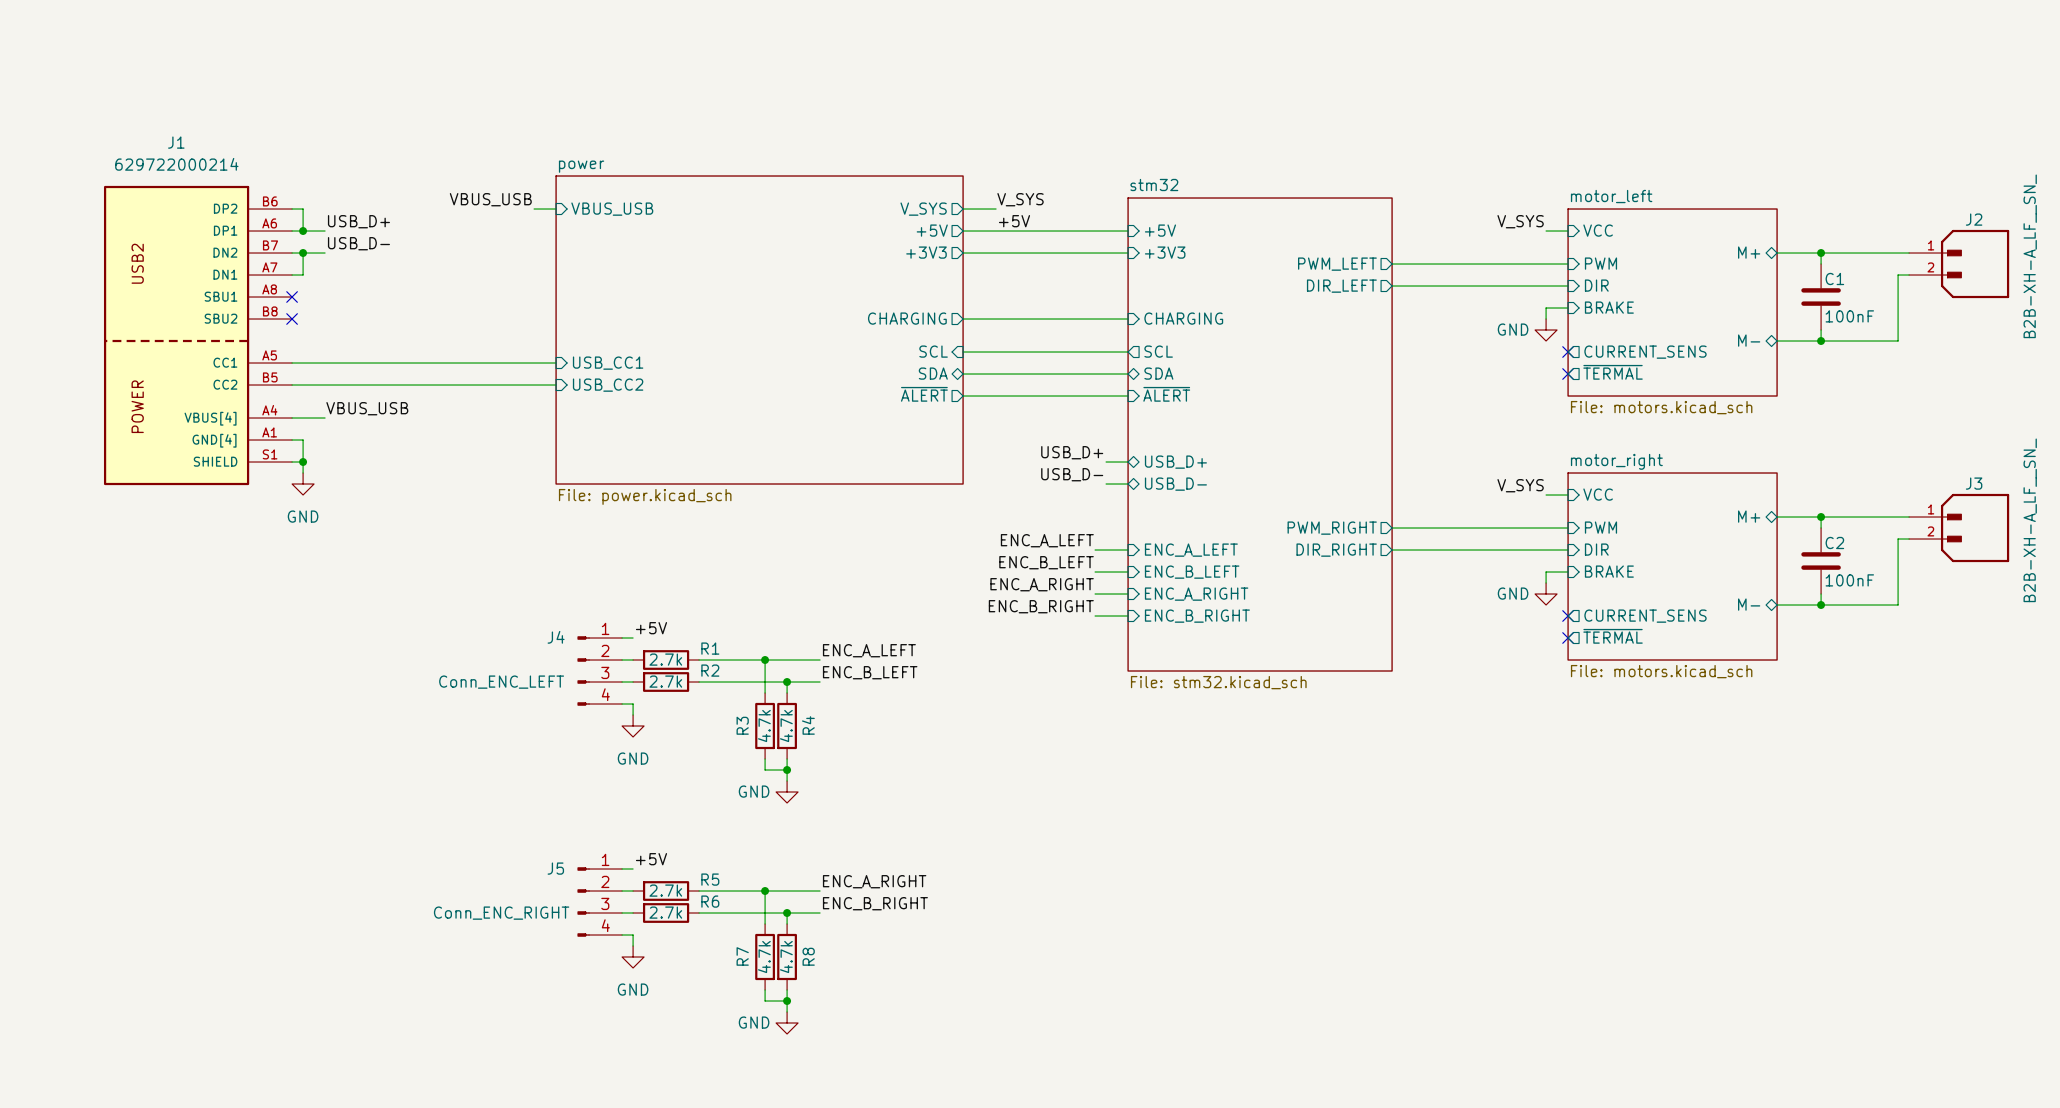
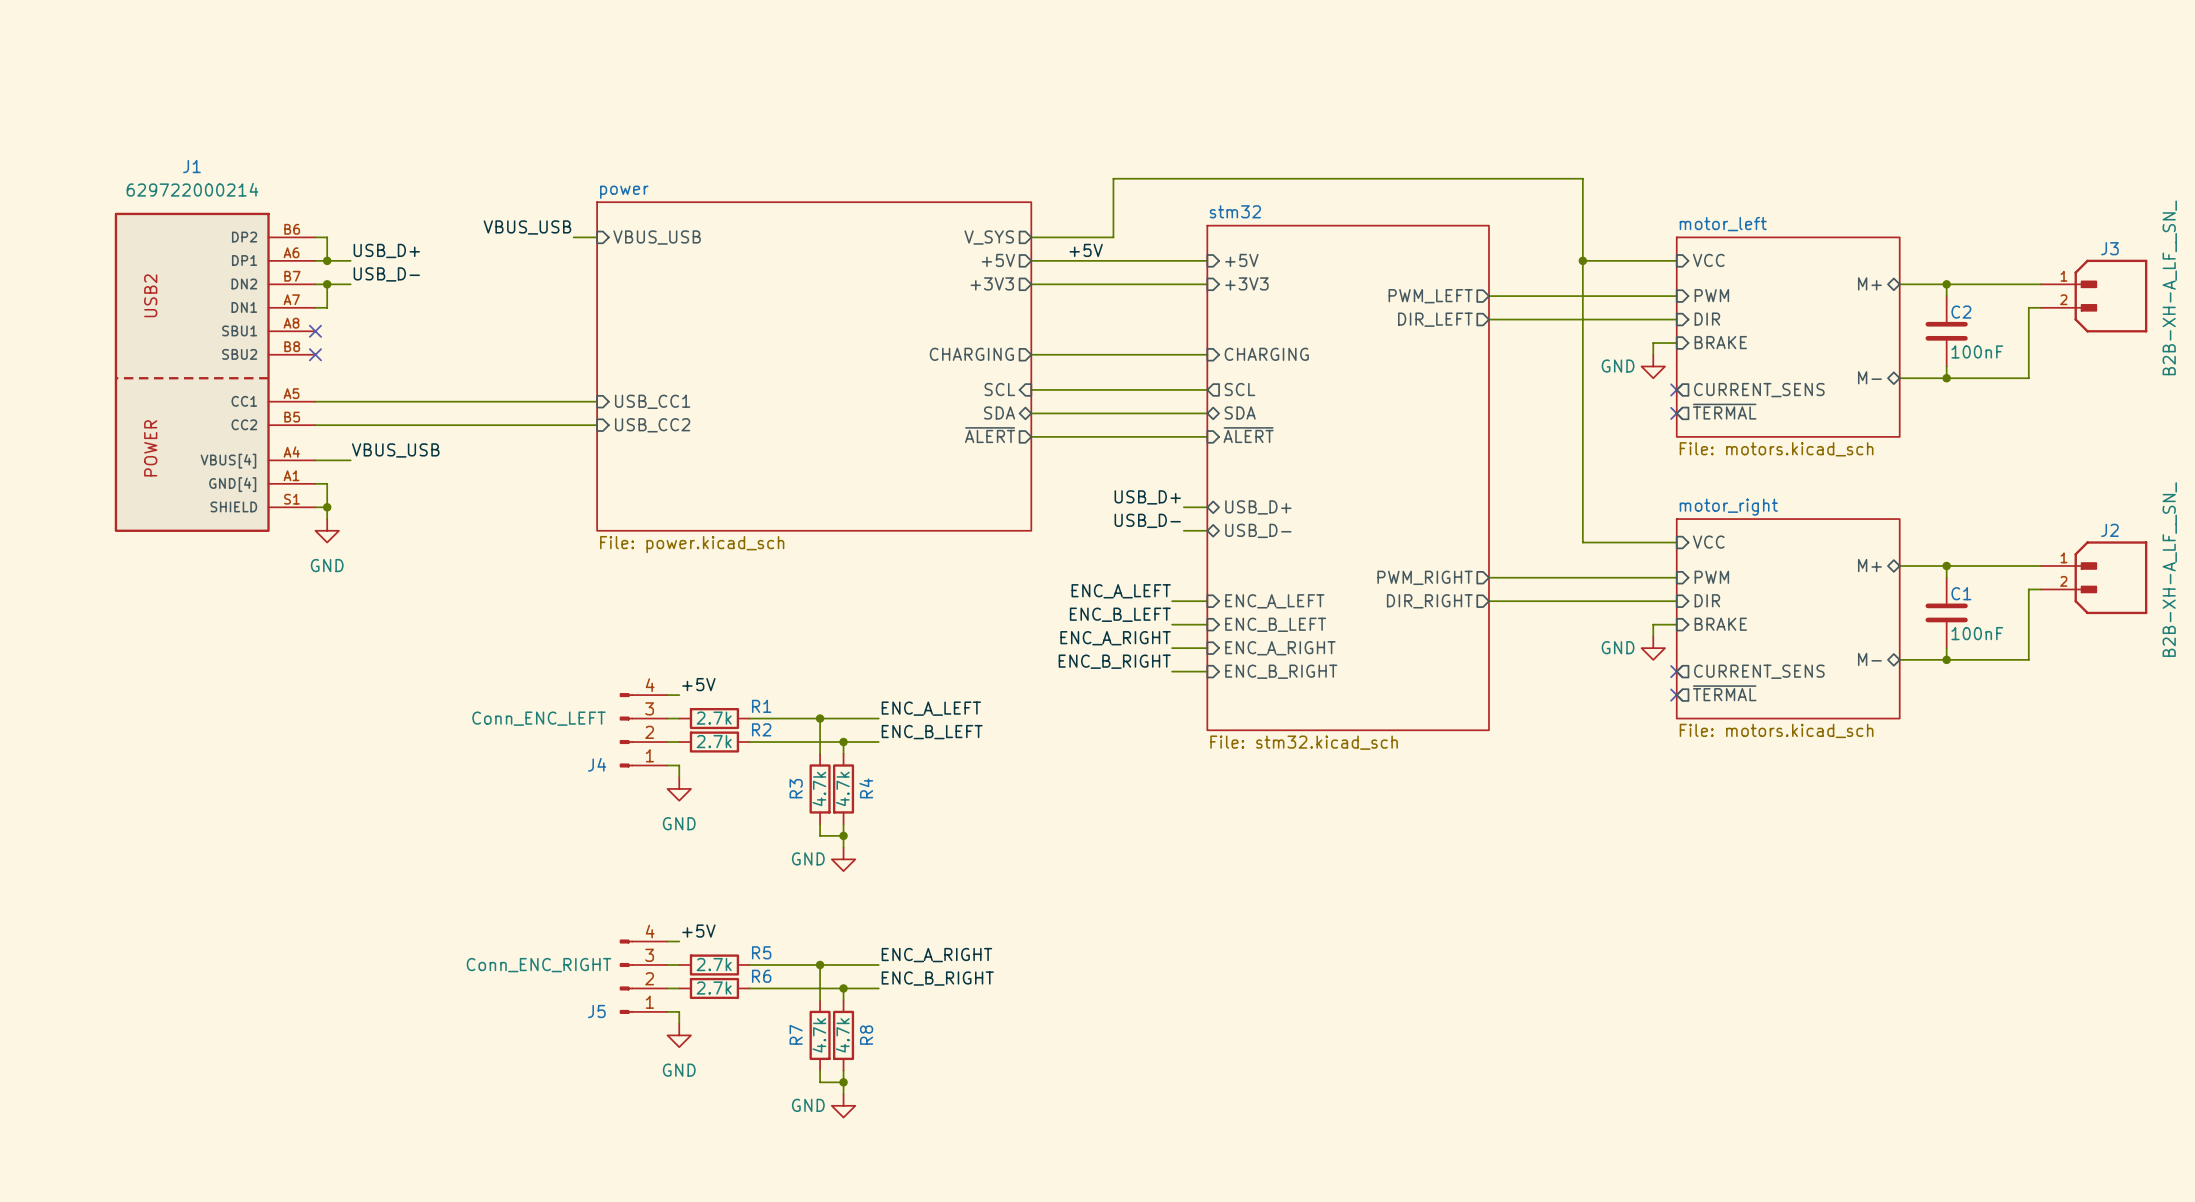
label: V_SYS (1020, 199) -> none
wire: none -> (1066, 237) (1113, 237) (1113, 178) (1582, 178) (1582, 542) (1653, 542)
J2 name: J2 (1974, 219) -> J3 (2109, 248)
label: V_SYS (1520, 221) -> none
wire: none -> (1582, 260) (1653, 260)
junction: none -> (1582, 260)
C1 name: C1 (1834, 278) -> C2 (1961, 312)
J3 name: J3 (1974, 483) -> J2 (2109, 530)
label: V_SYS (1520, 485) -> none
C2 name: C2 (1834, 542) -> C1 (1961, 593)
J4 flip: as is (583, 671) -> up-down (626, 730)
J5 flip: as is (583, 902) -> up-down (626, 976)

